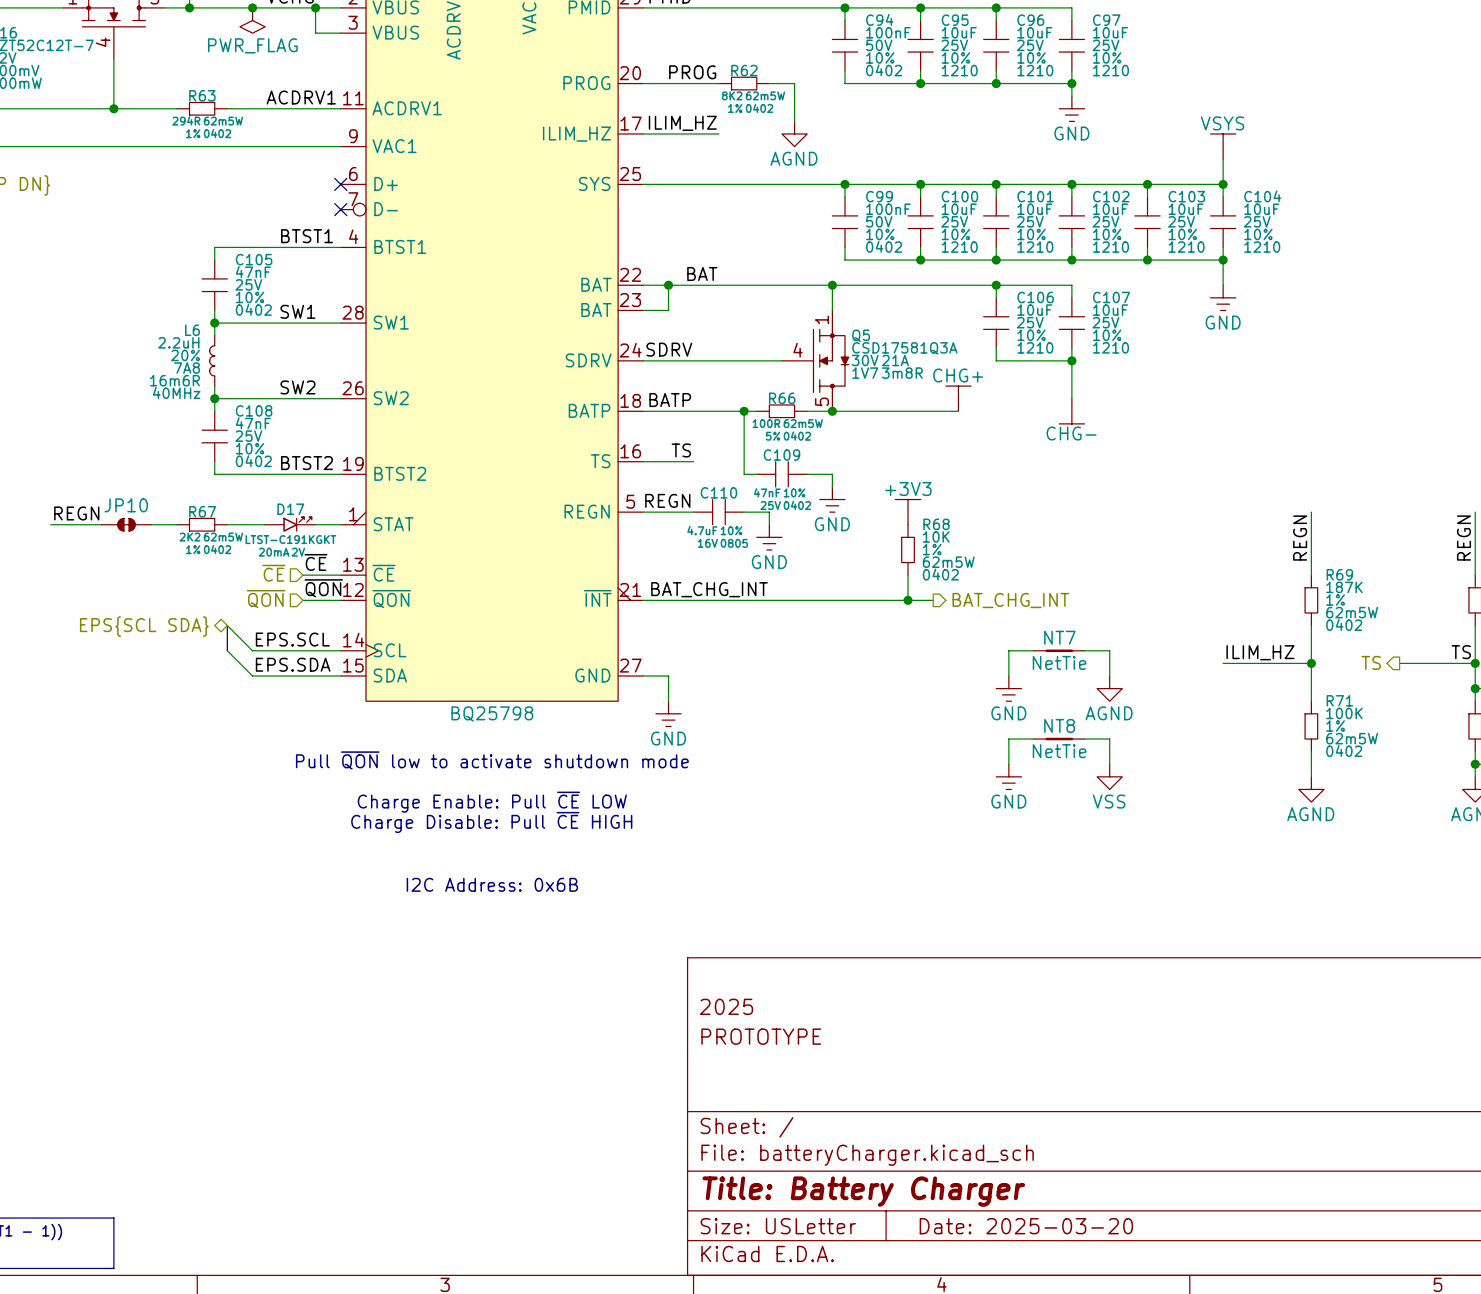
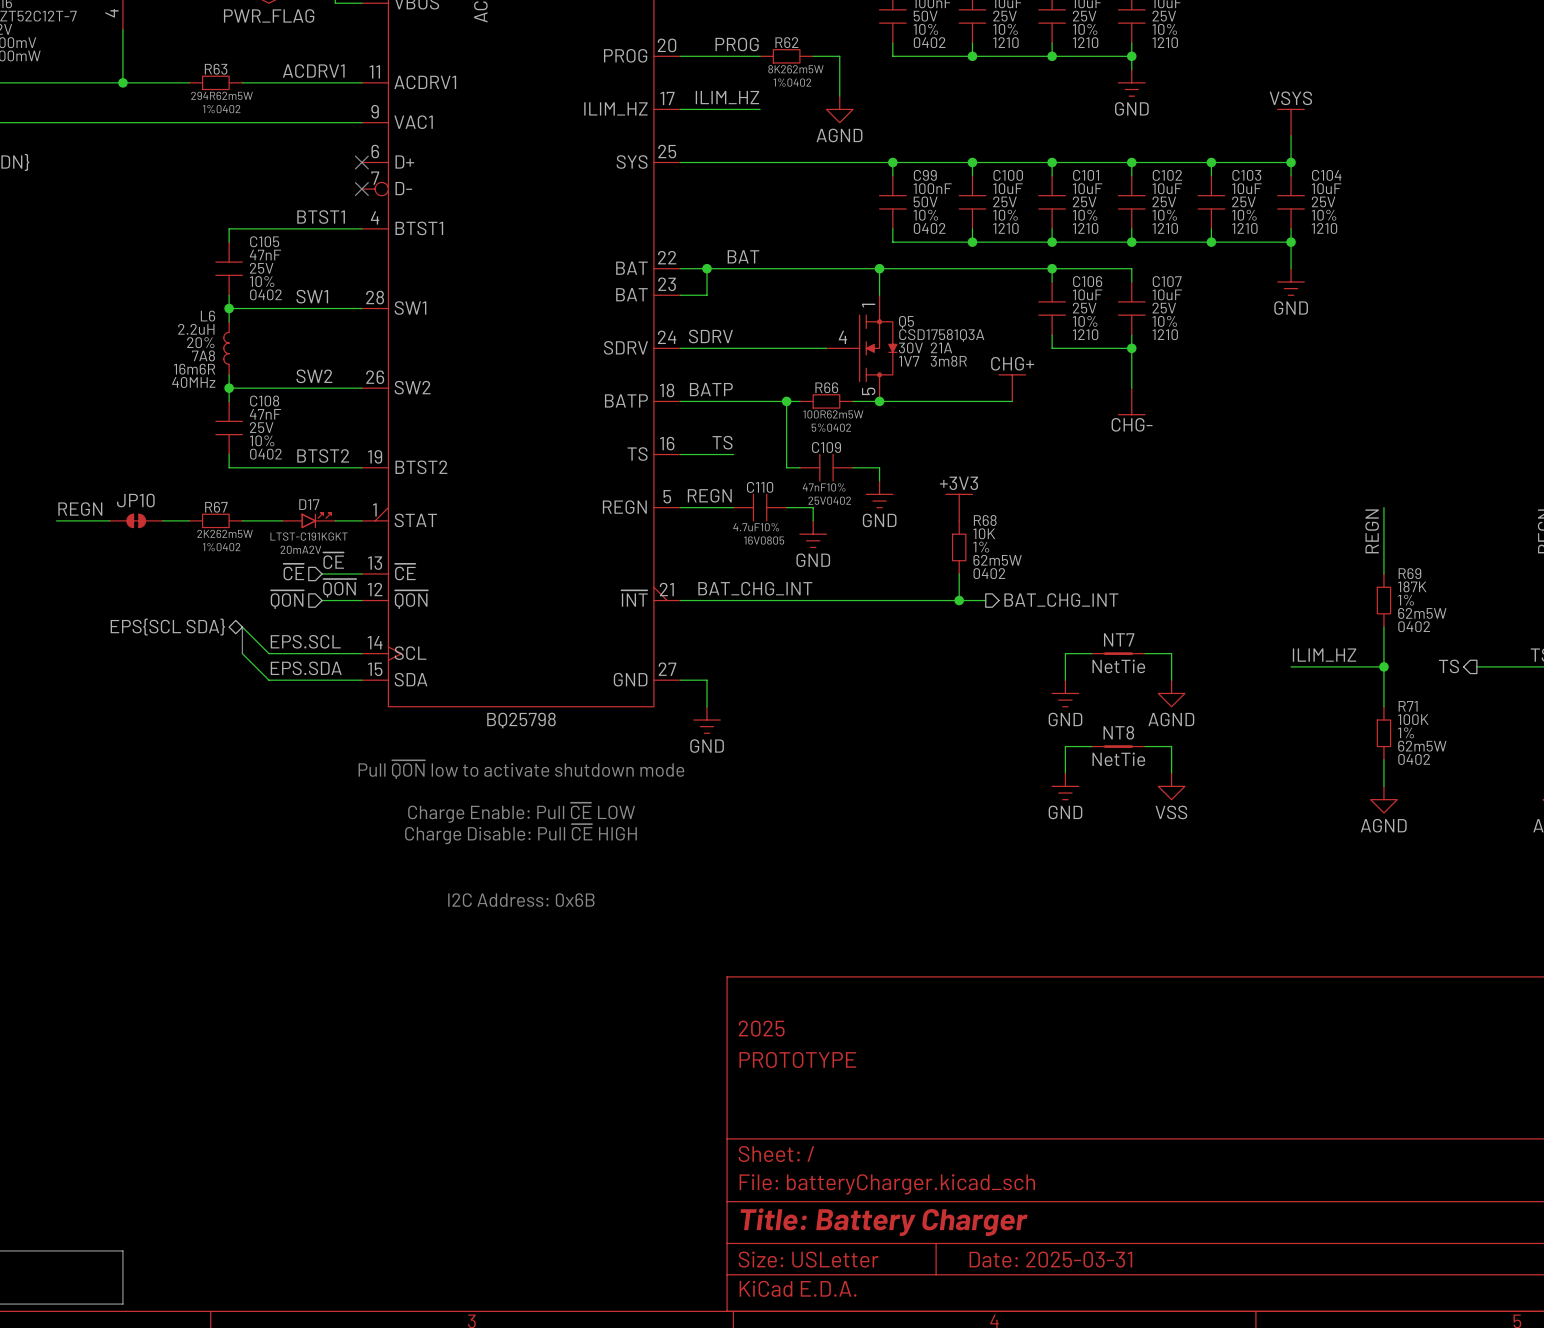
title block: Date: 2025-03-20 (1026, 1226) -> Date: 2025-03-31 (1050, 1259)

